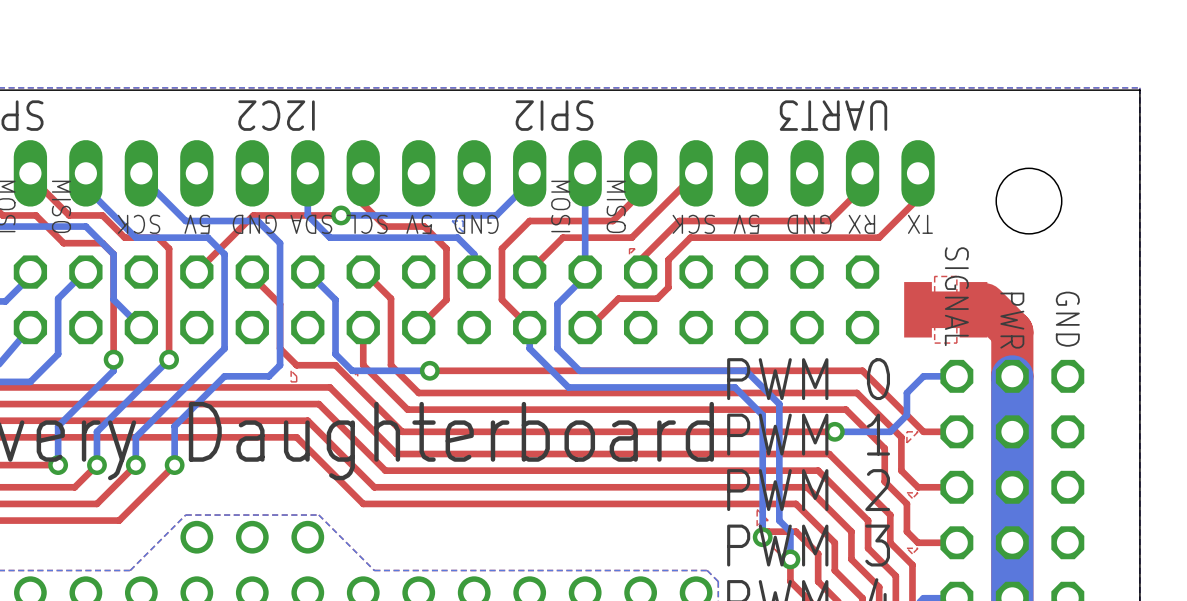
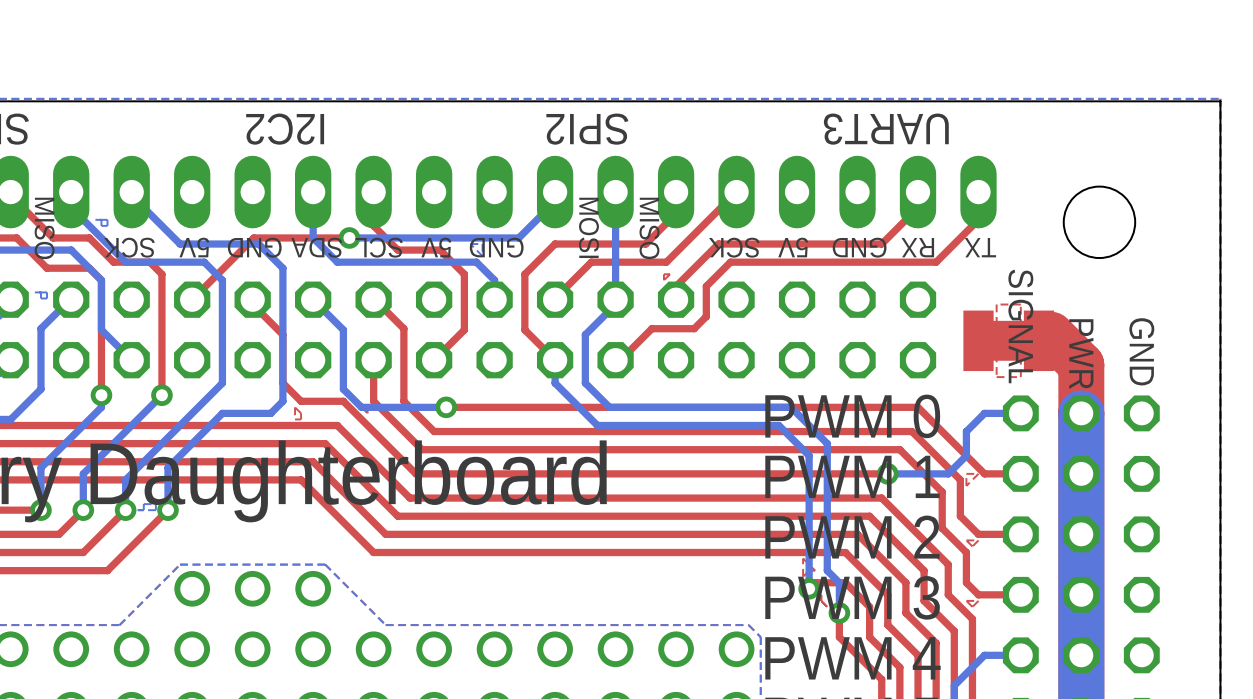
bottom zone outline: none -> (101, 219) (101, 225) (107, 225) (107, 219) (95, 219)
bottom zone outline: none -> (40, 292) (40, 298) (47, 298) (47, 292) (34, 292)
bottom zone outline: none -> (143, 510) (143, 504) (155, 504) (155, 510) (137, 510)

